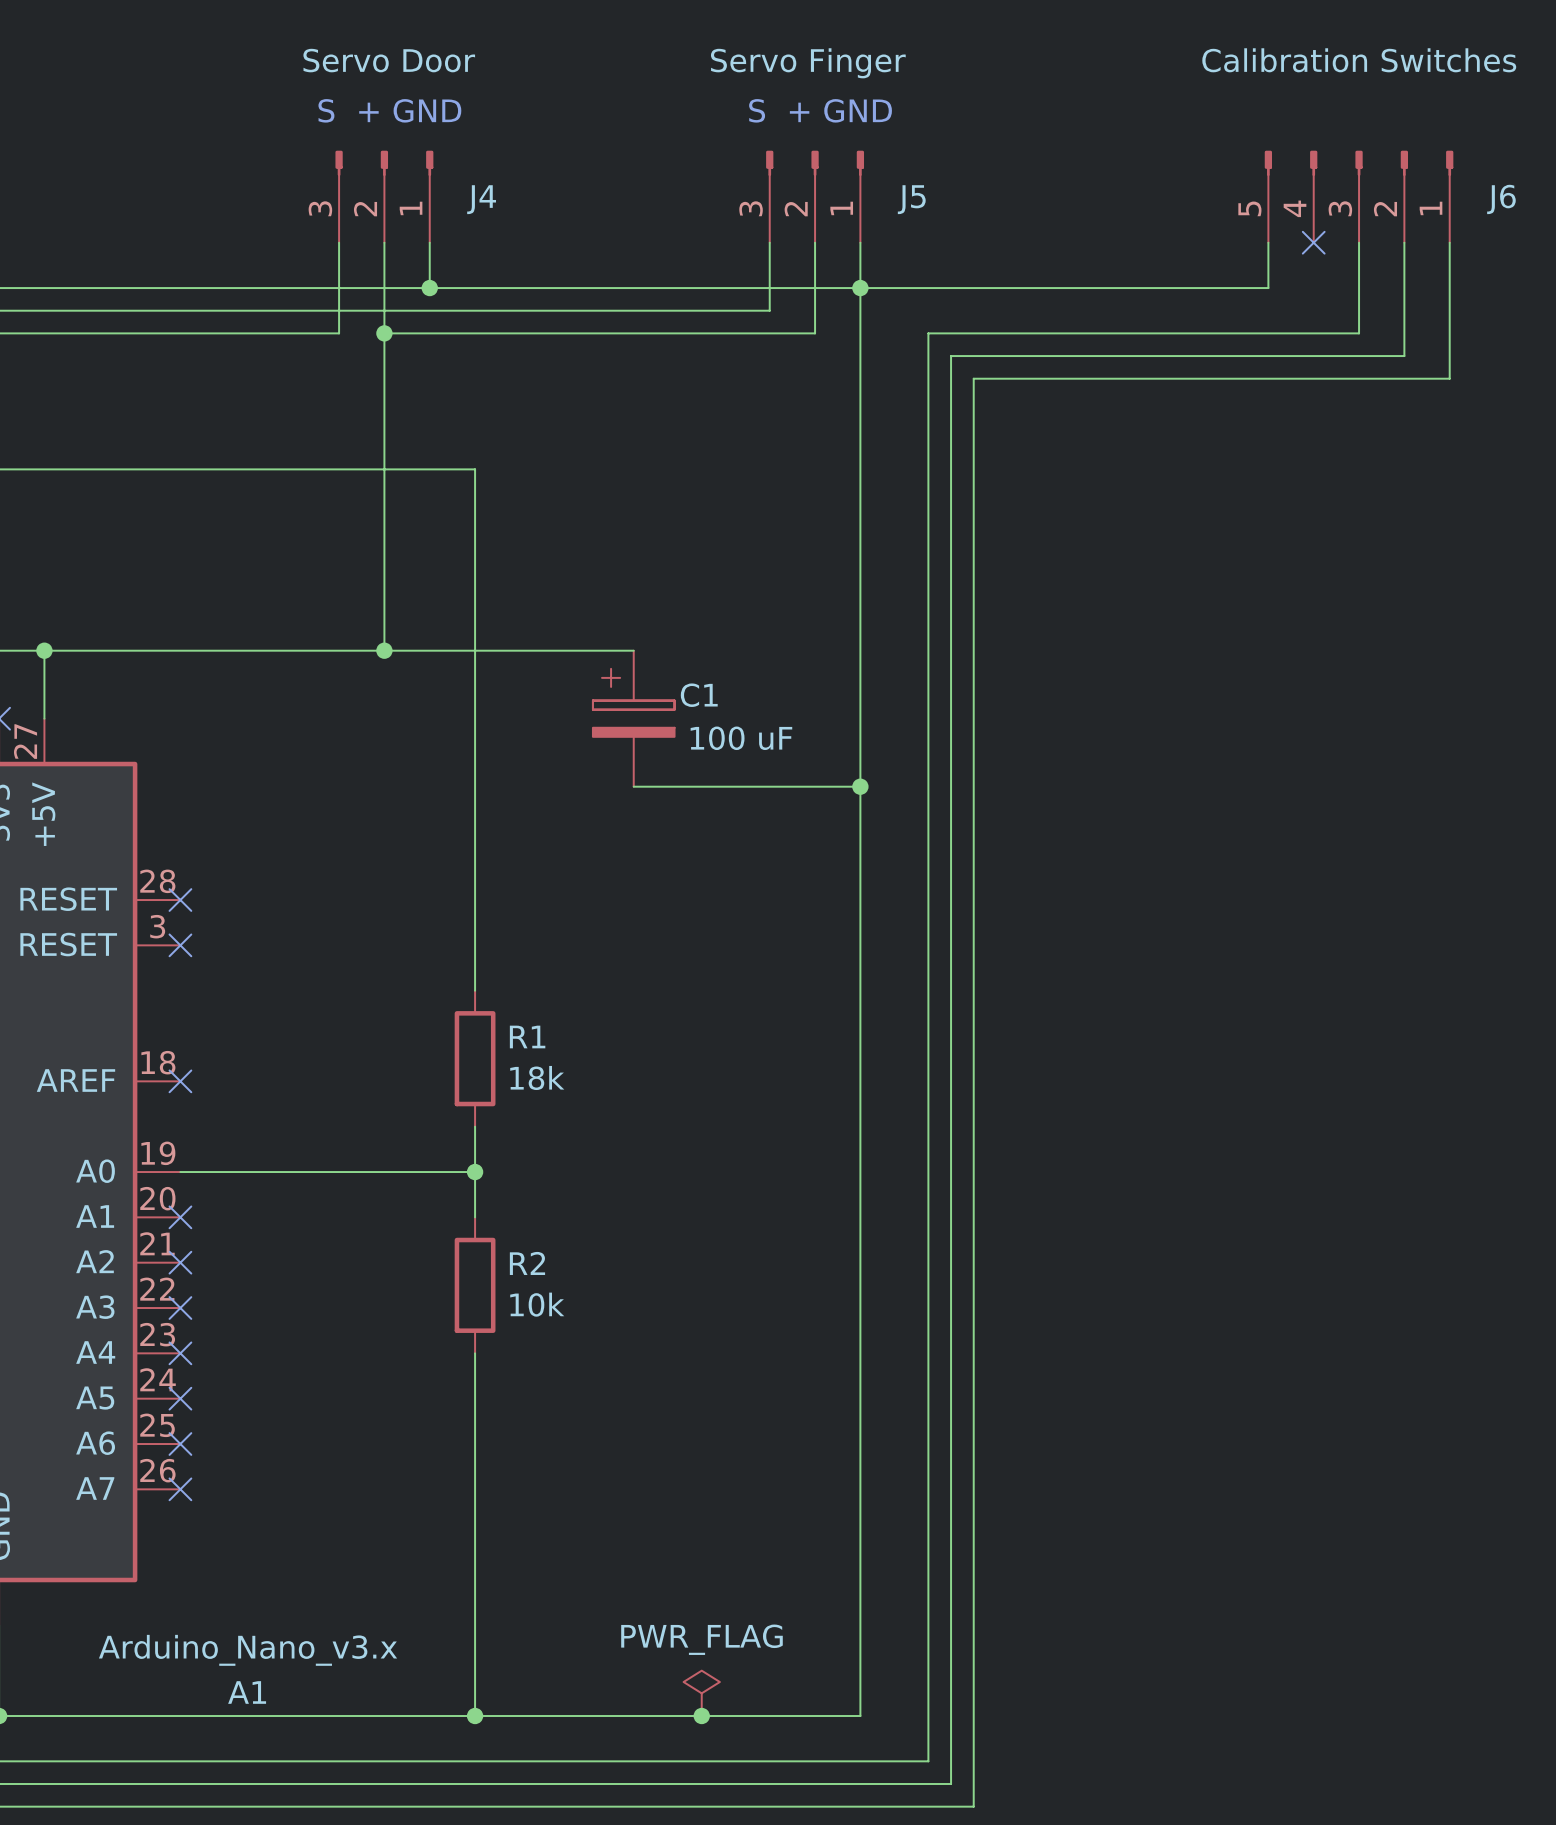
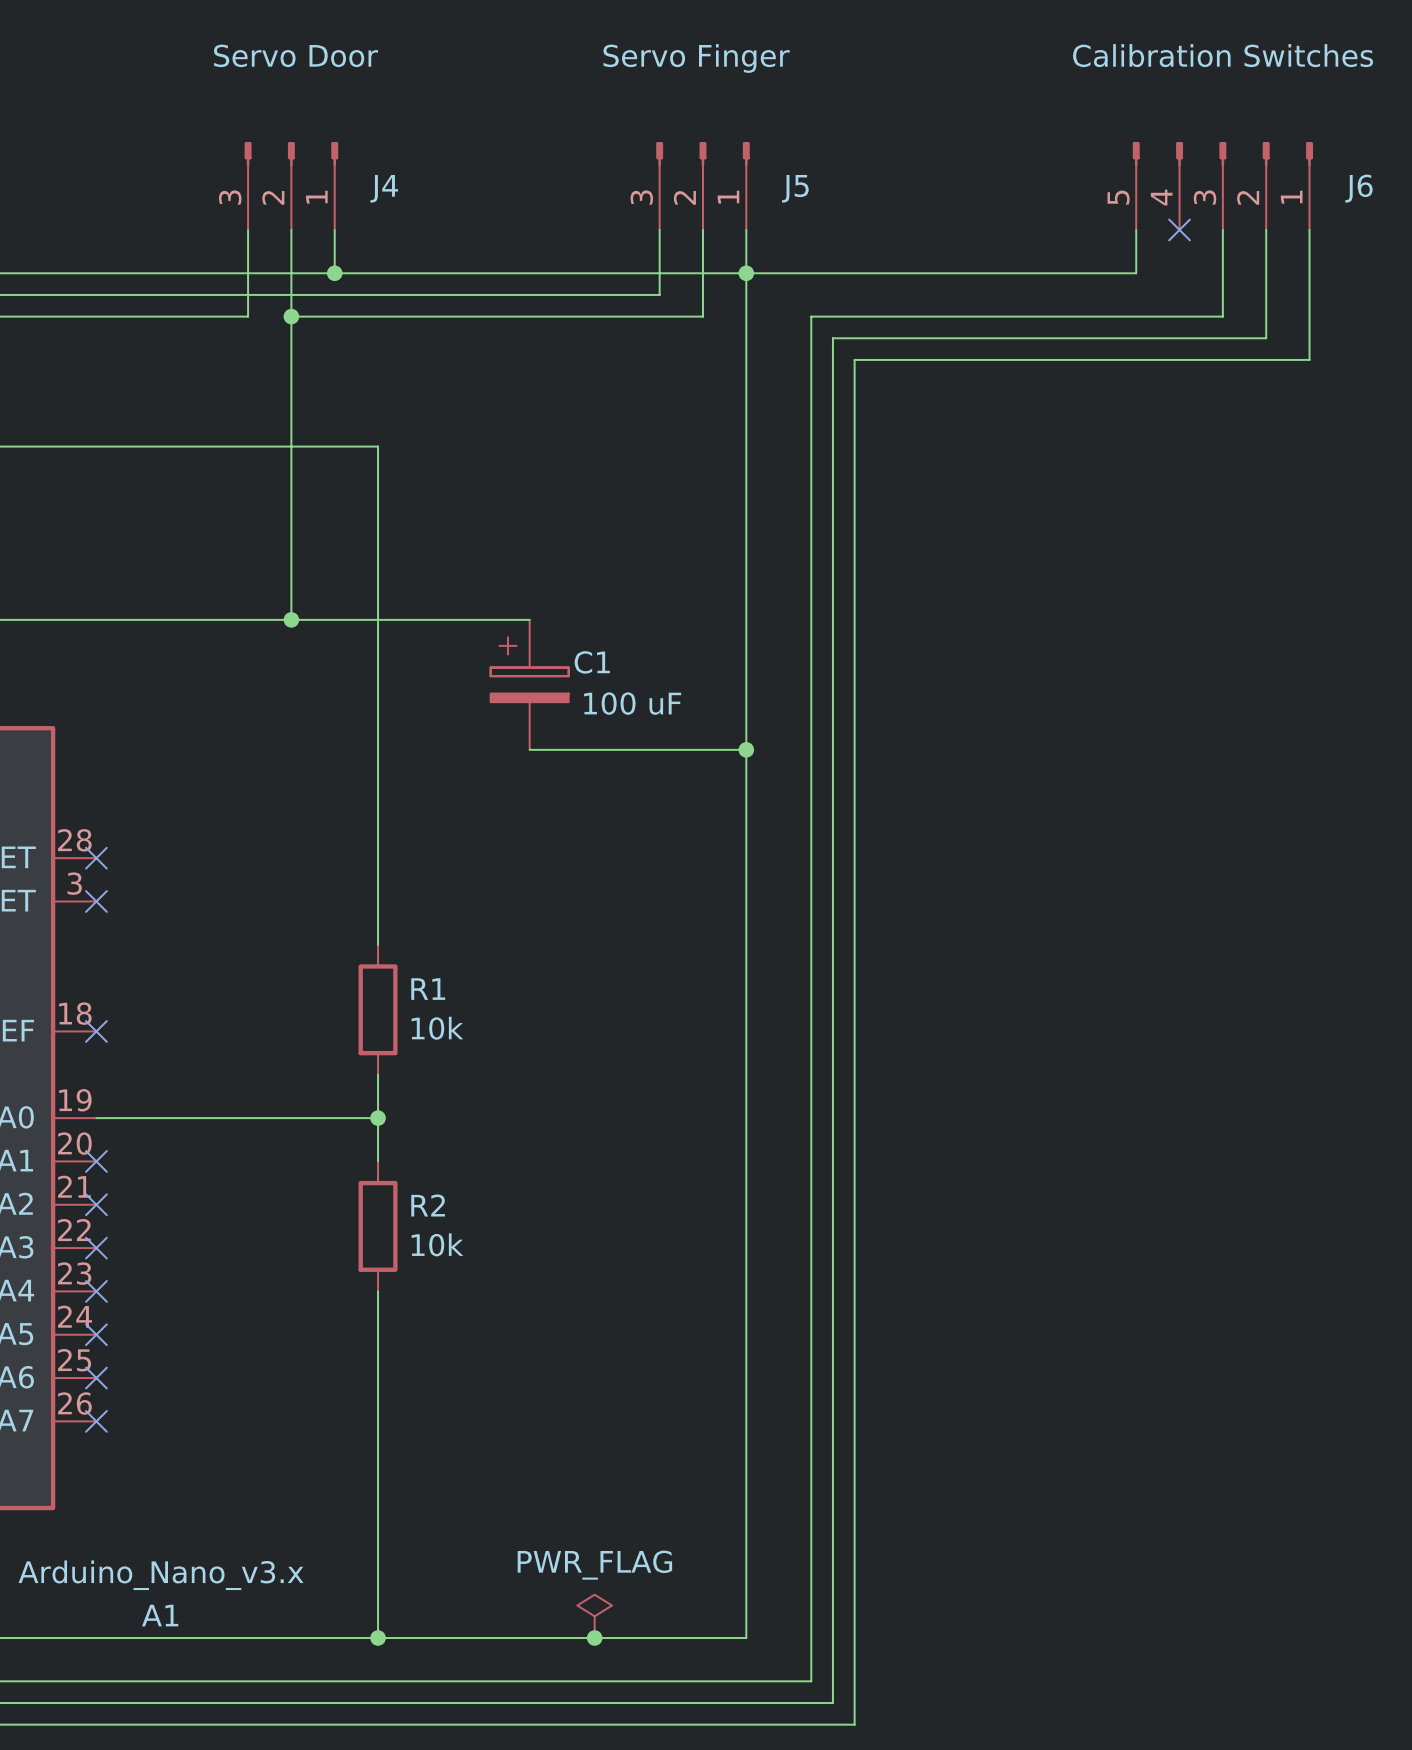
text: S + GND (389, 110) -> none
text: S + GND (820, 110) -> none
R1 value: 18k (537, 1077) -> 10k (437, 1028)

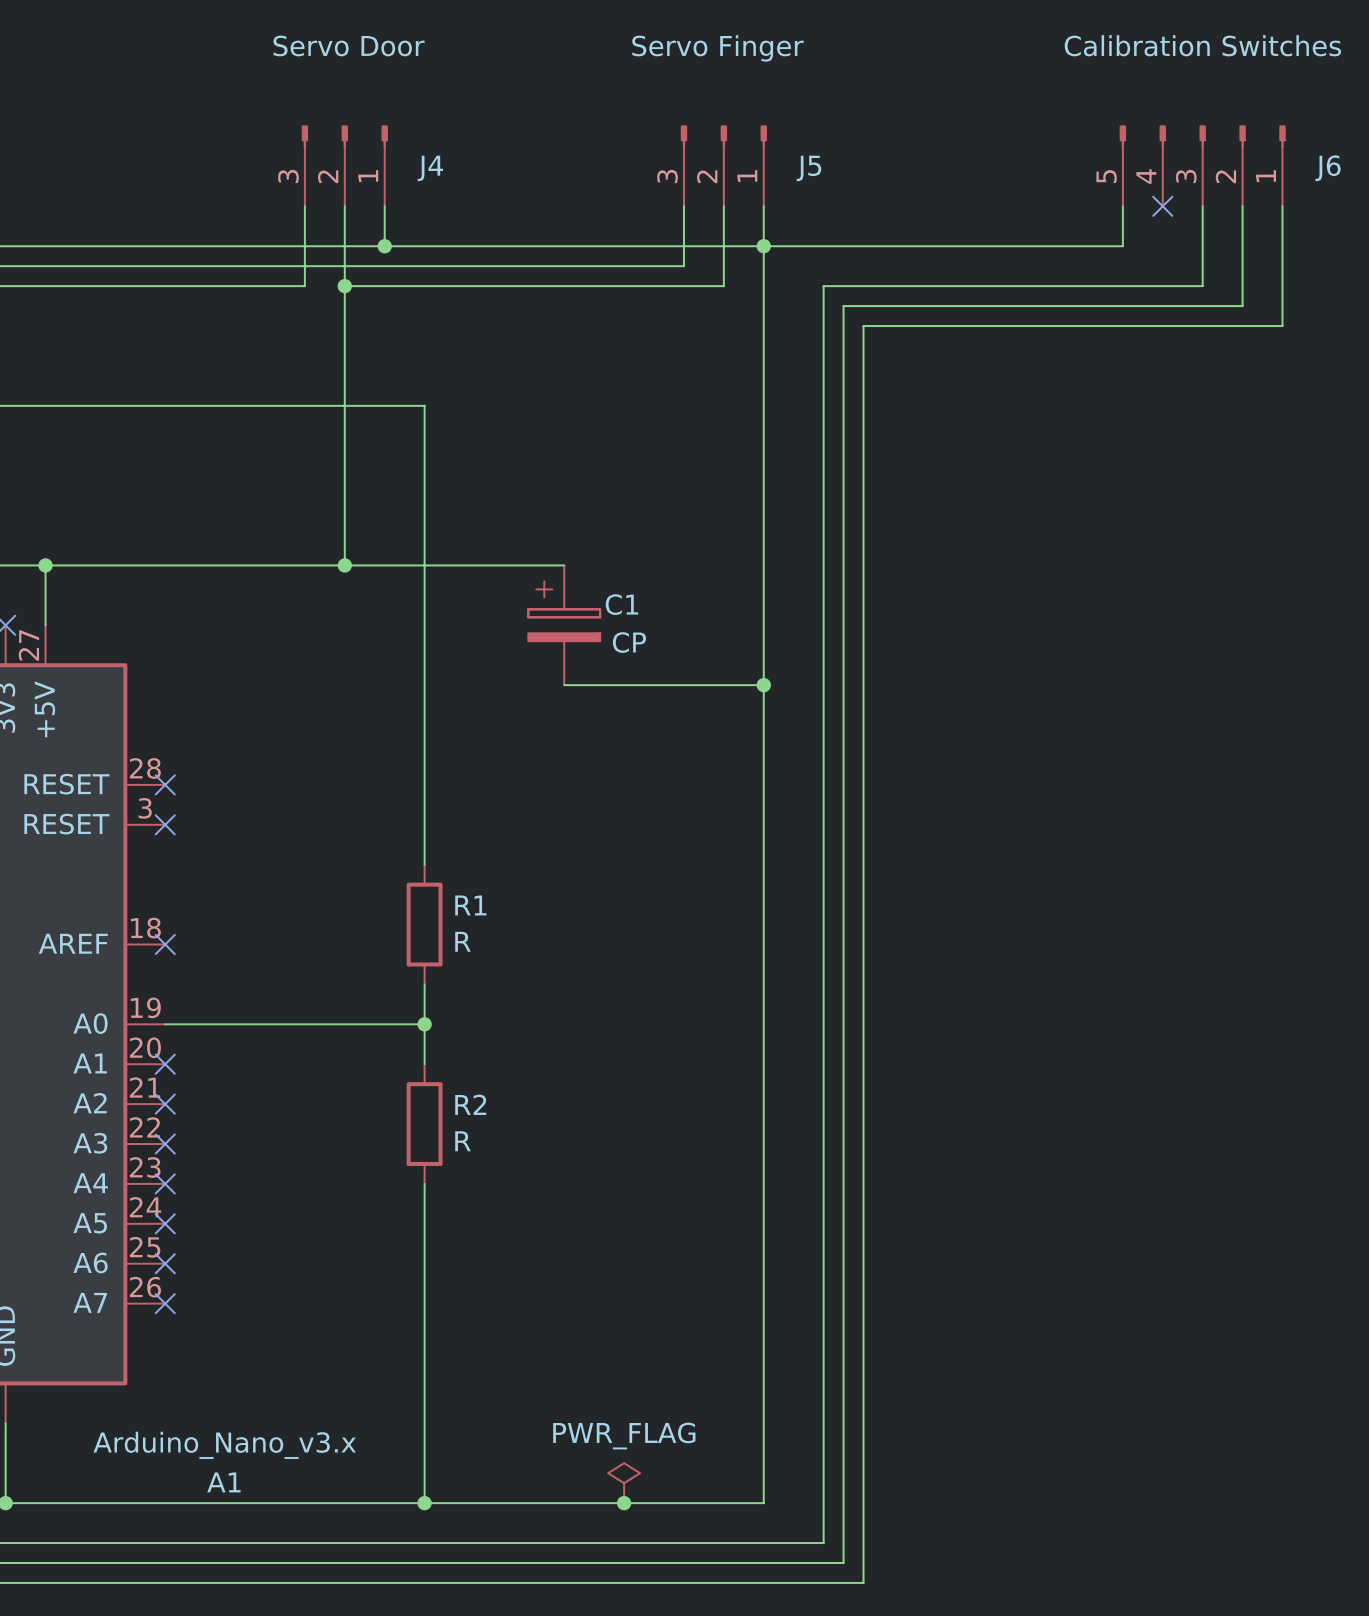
C1 value: 100 uF (632, 703) -> CP (629, 642)
R1 value: 10k (437, 1028) -> R (462, 941)
R2 value: 10k (437, 1244) -> R (462, 1141)

